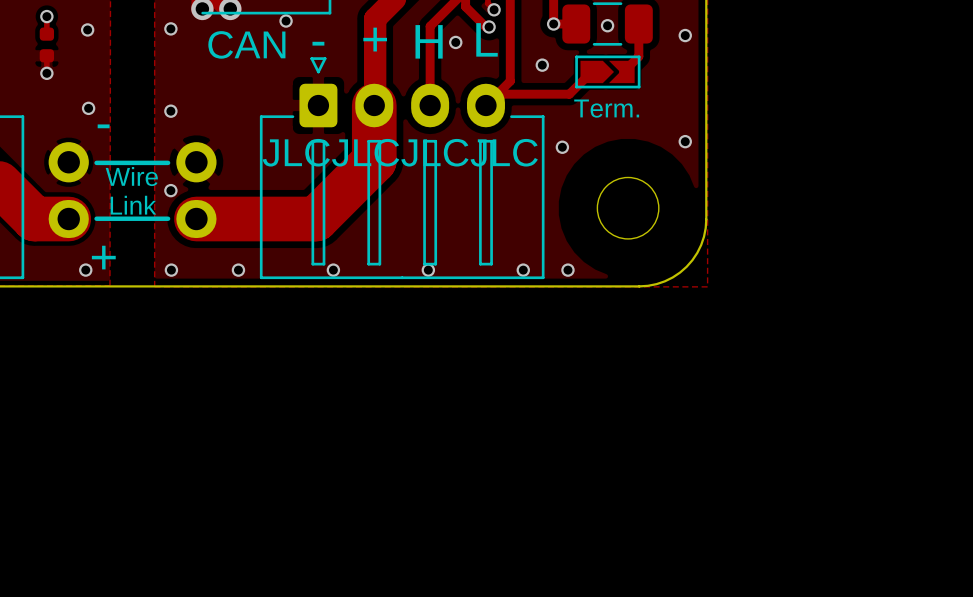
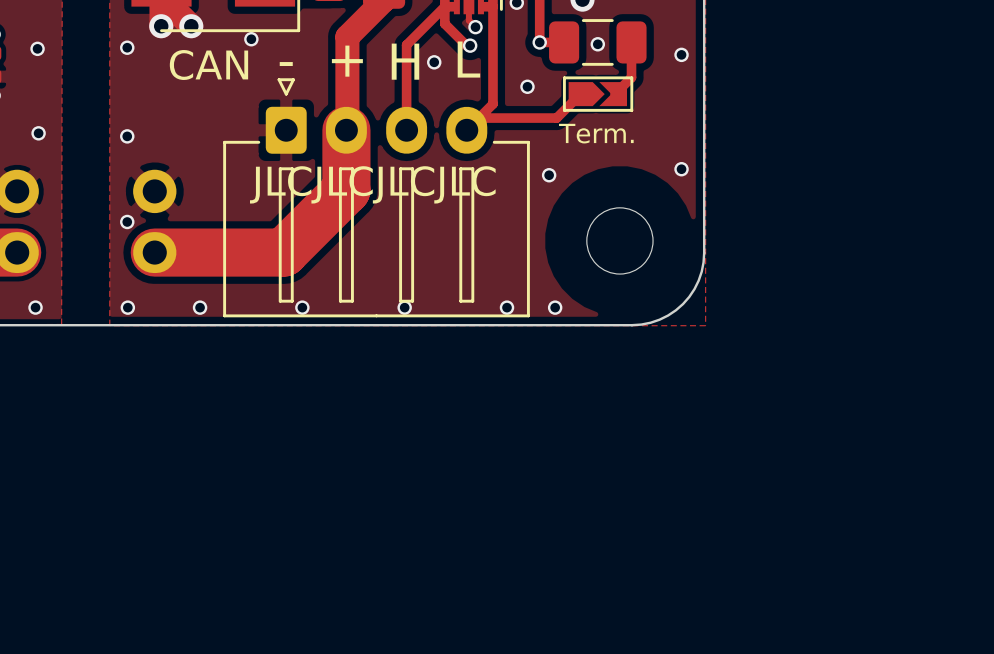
text: - (103, 126) -> none
line: (96, 162) (168, 162) -> none
text: Wire (131, 176) -> none
text: Link (133, 205) -> none
line: (96, 218) (168, 218) -> none
text: + (103, 257) -> none

